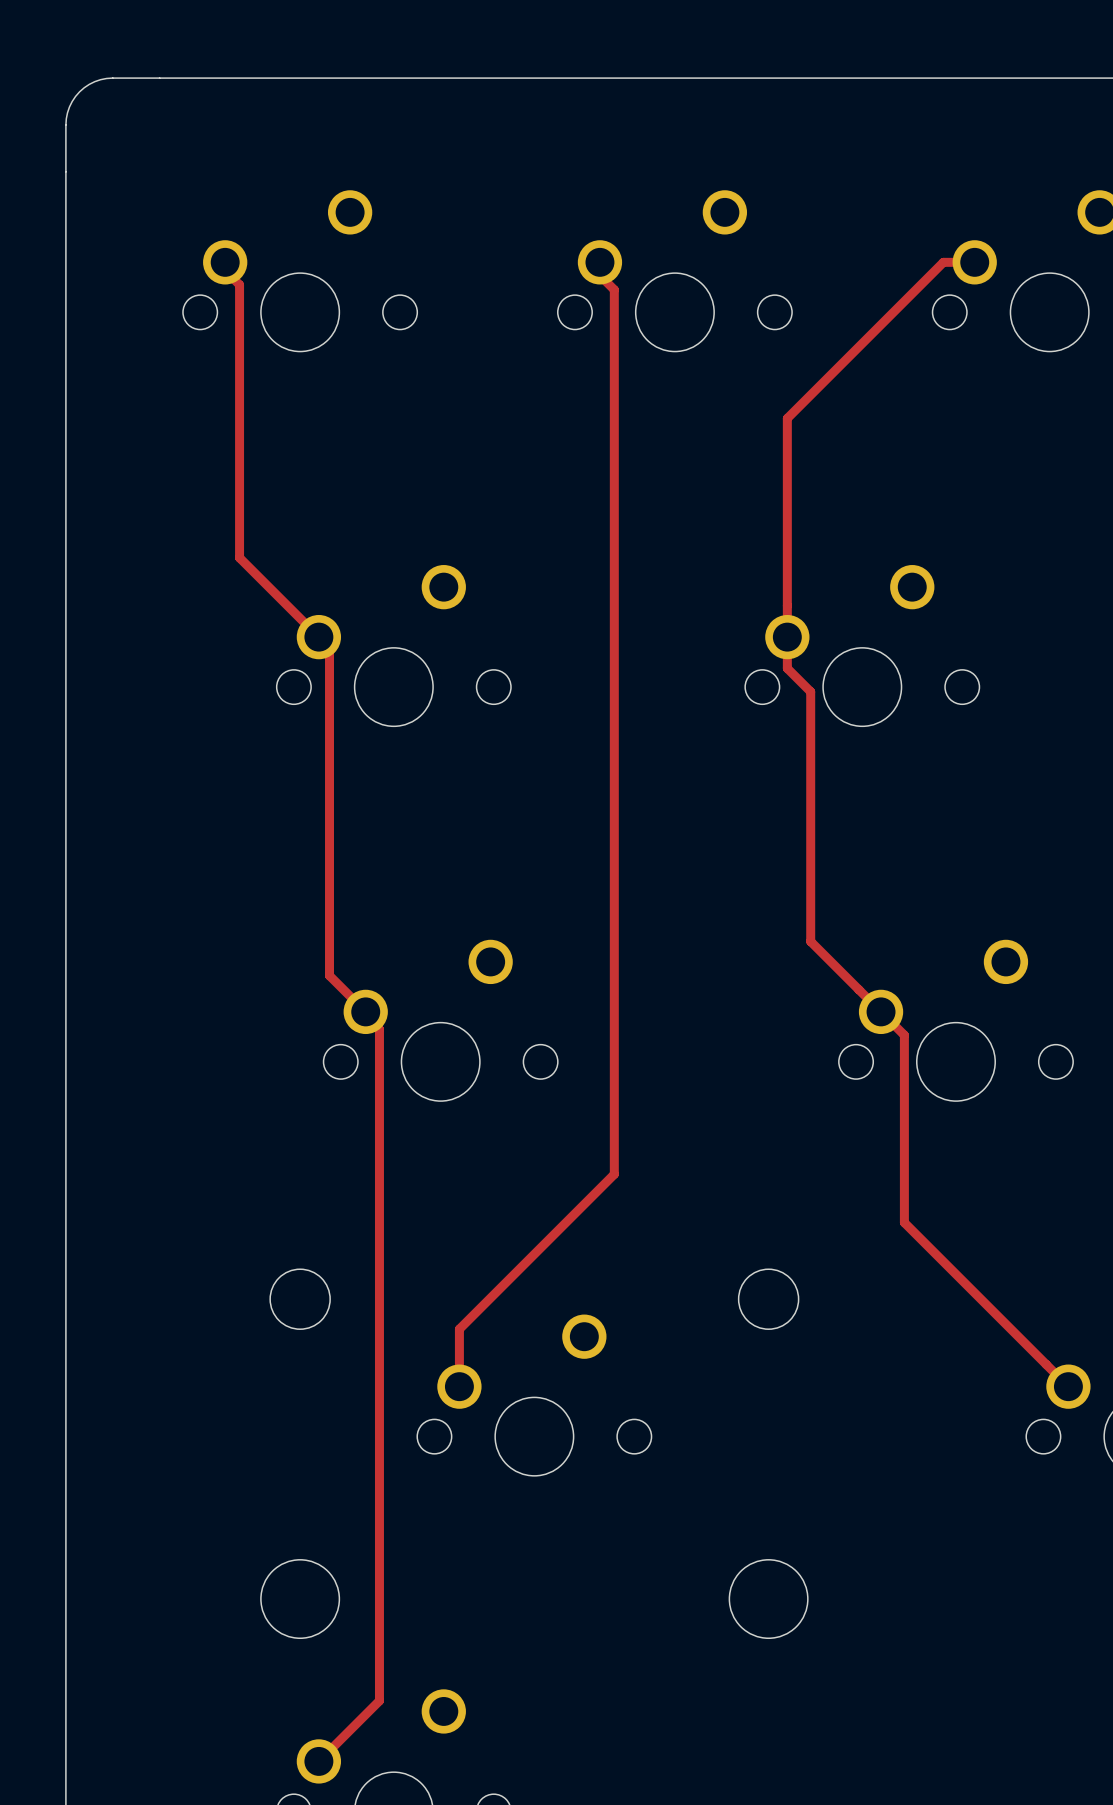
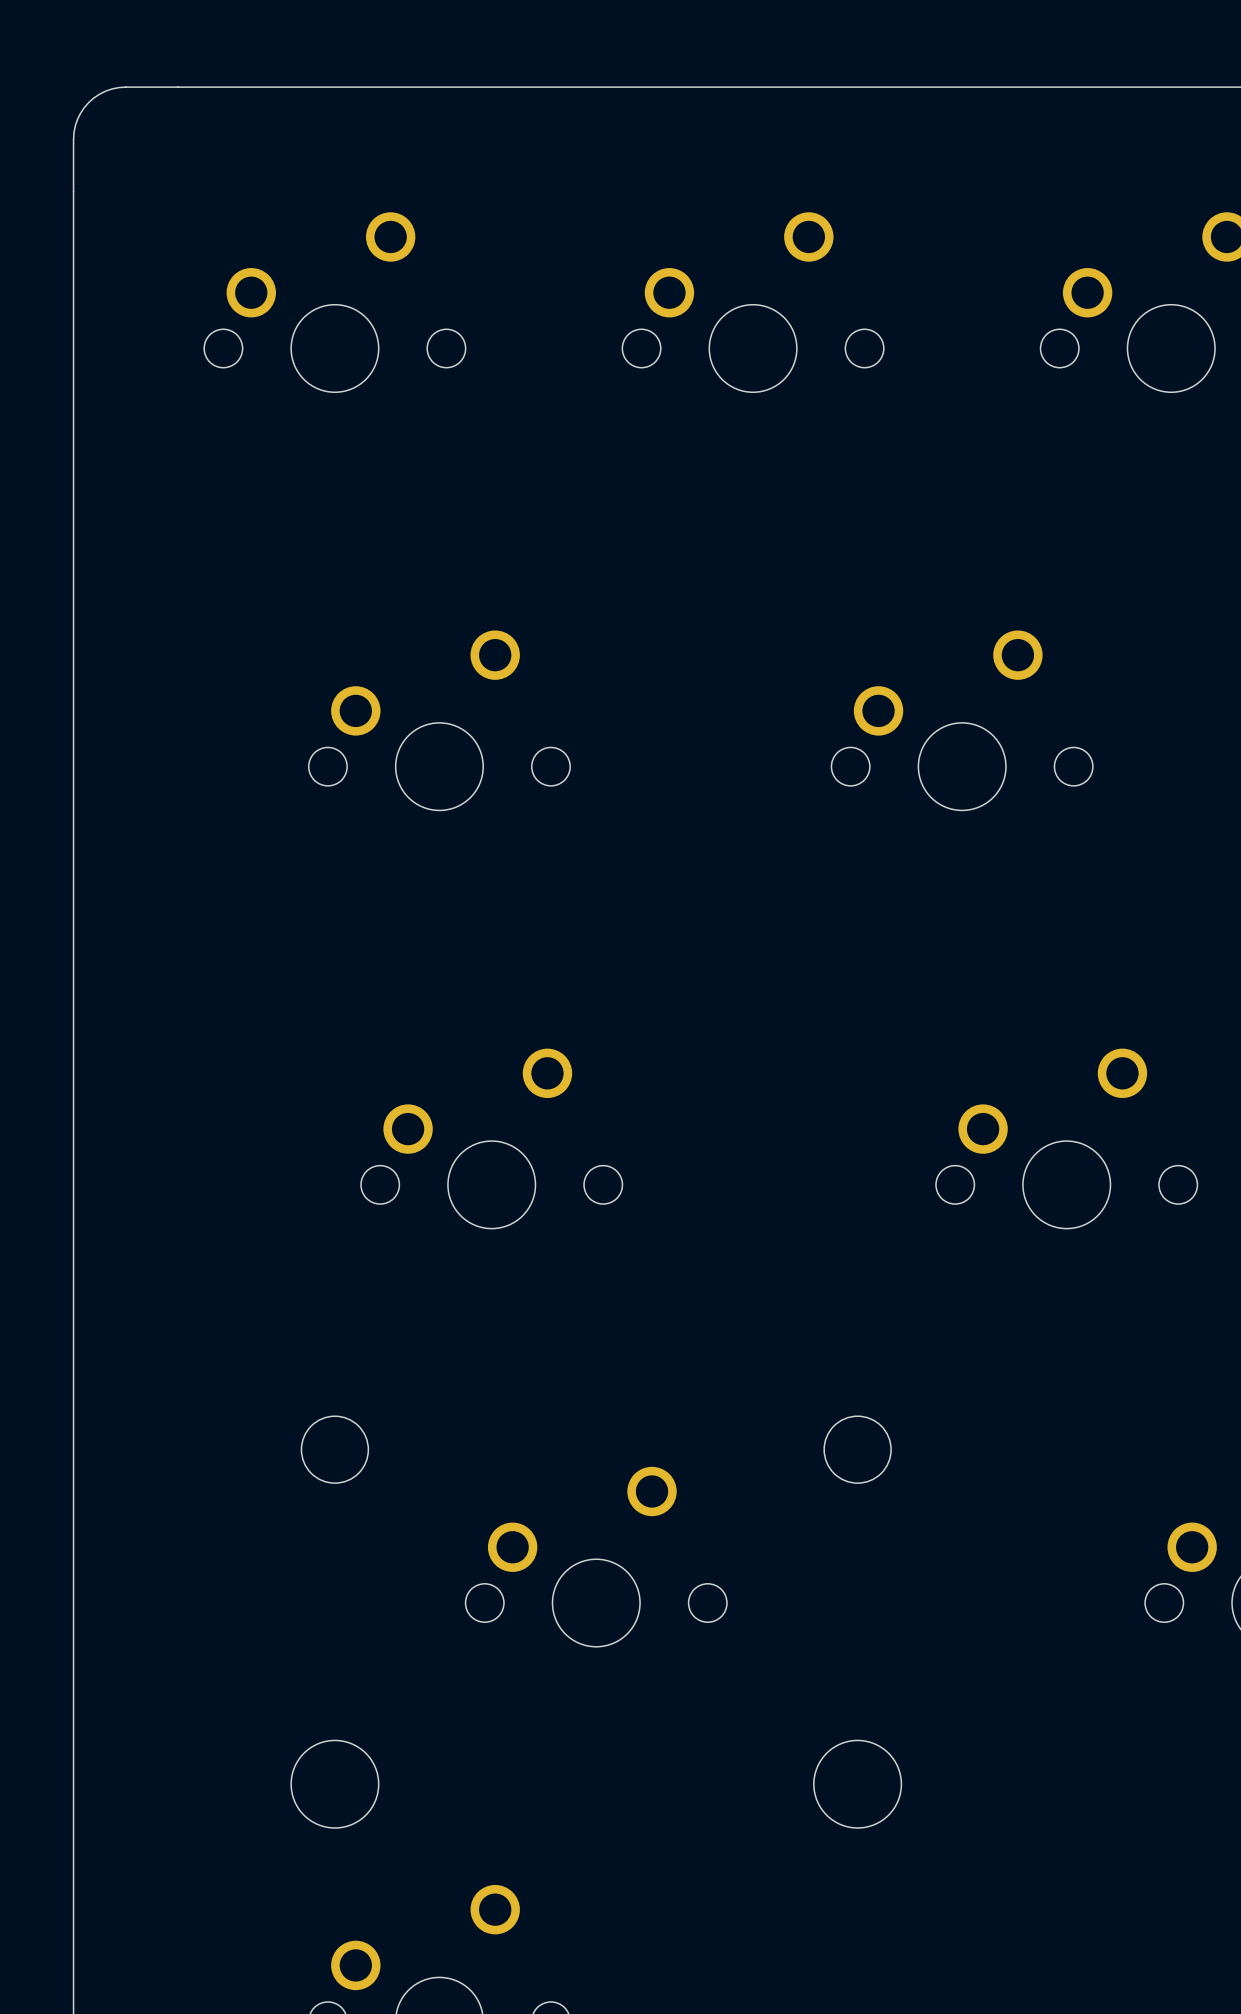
track: (599, 262) (599, 275) (614, 289) (614, 1174) (459, 1329) (459, 1386) -> none
track: (974, 262) (943, 262) (787, 418) (787, 668) (810, 691) (810, 941) (904, 1035) (904, 1222) (1068, 1386) -> none
track: (225, 270) (239, 284) (239, 557) (318, 637) (318, 643) (329, 654) (329, 975) (365, 1011) (365, 1025) -> none
track: (365, 1015) (379, 1029) (379, 1700) (318, 1761) -> none

